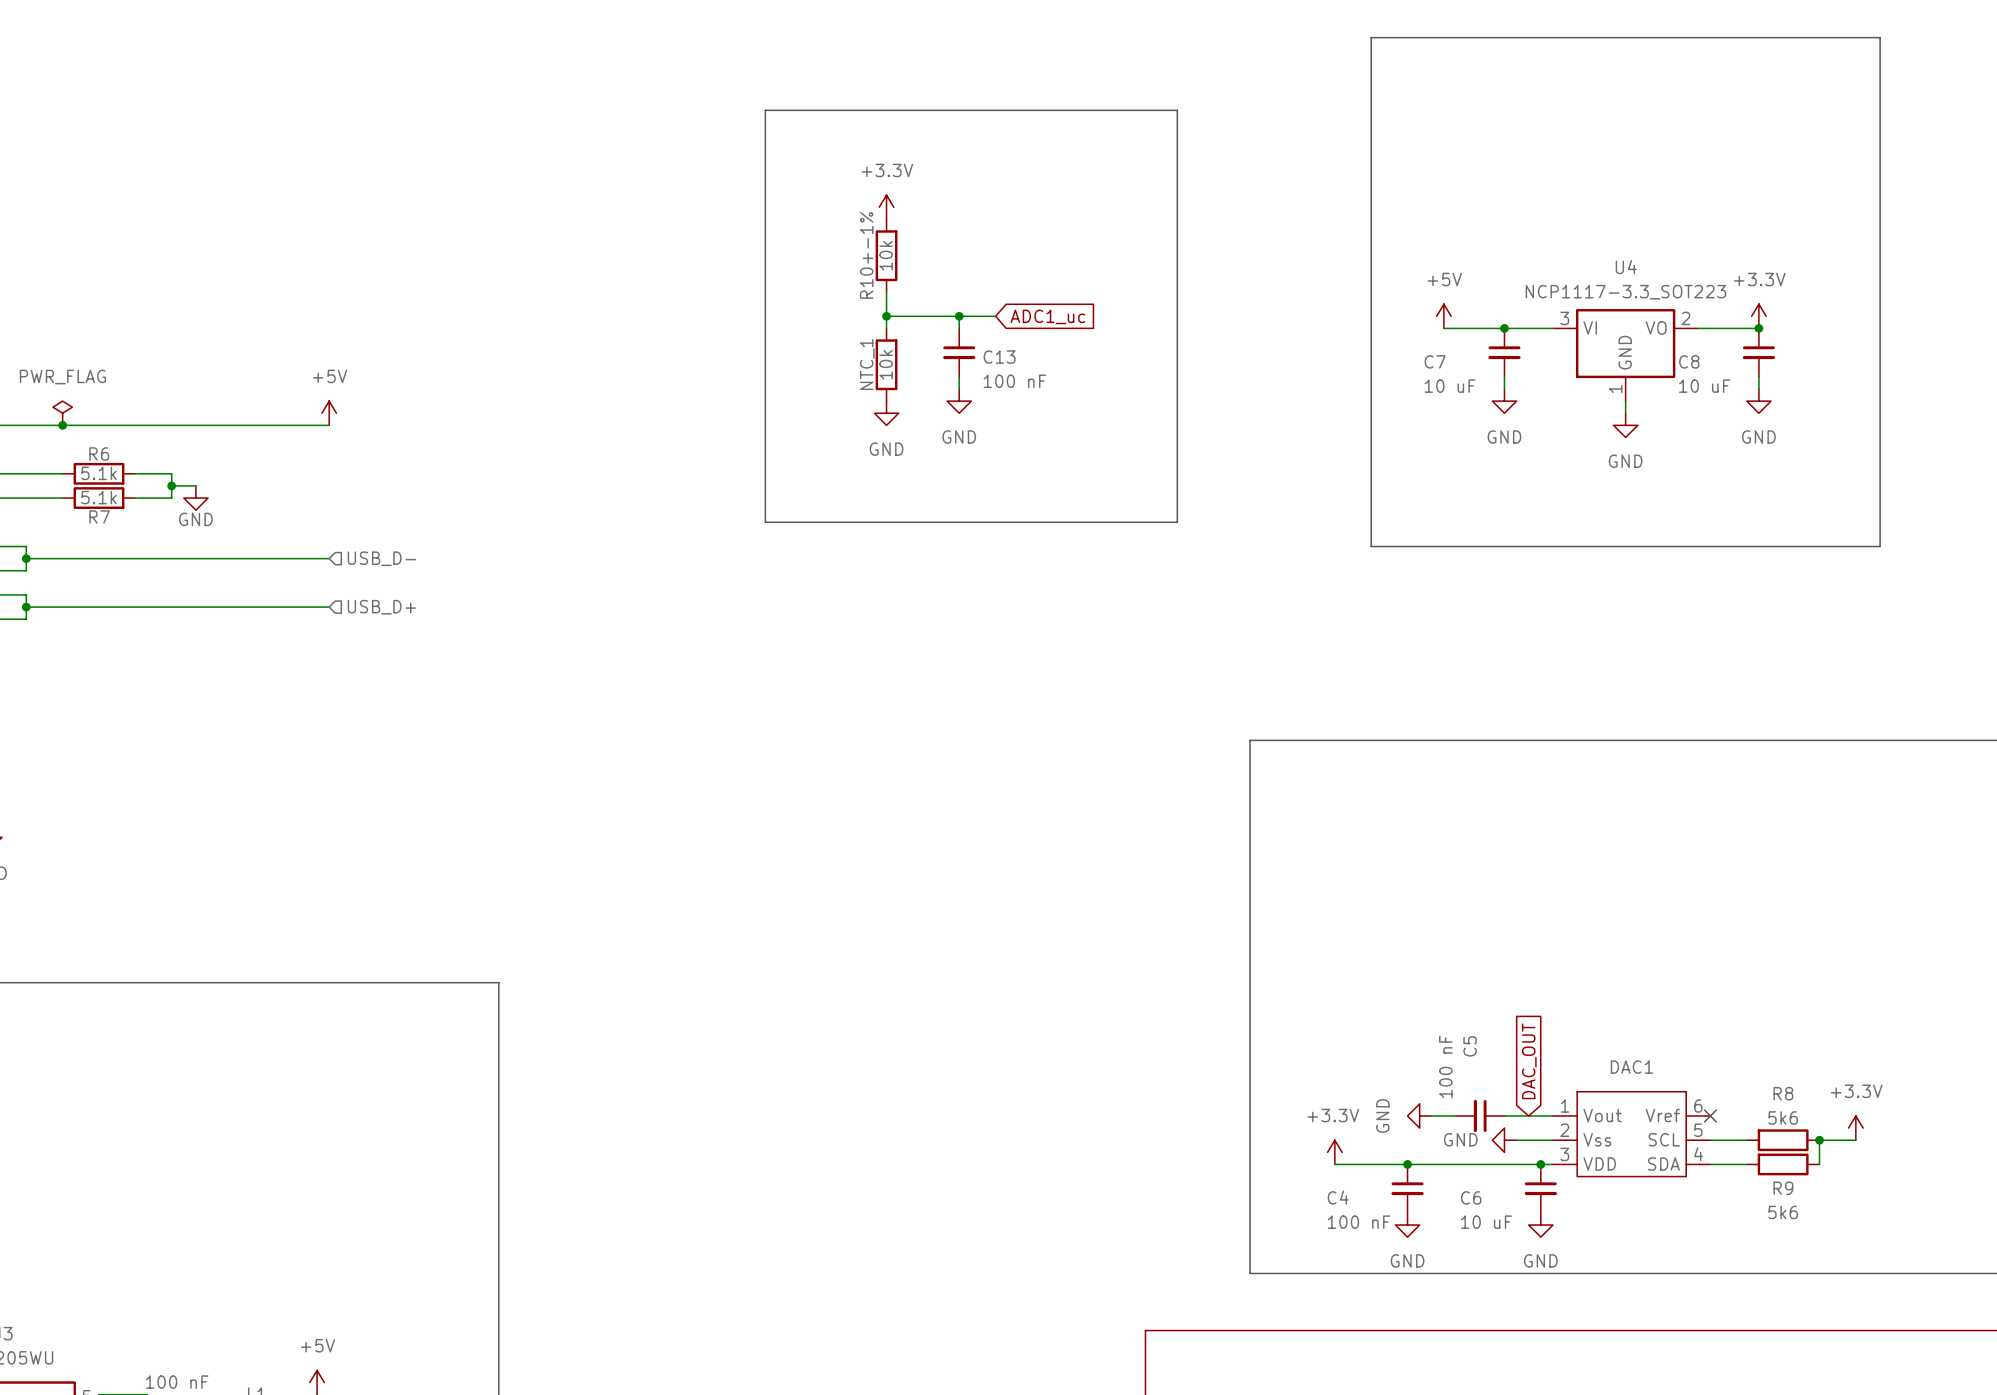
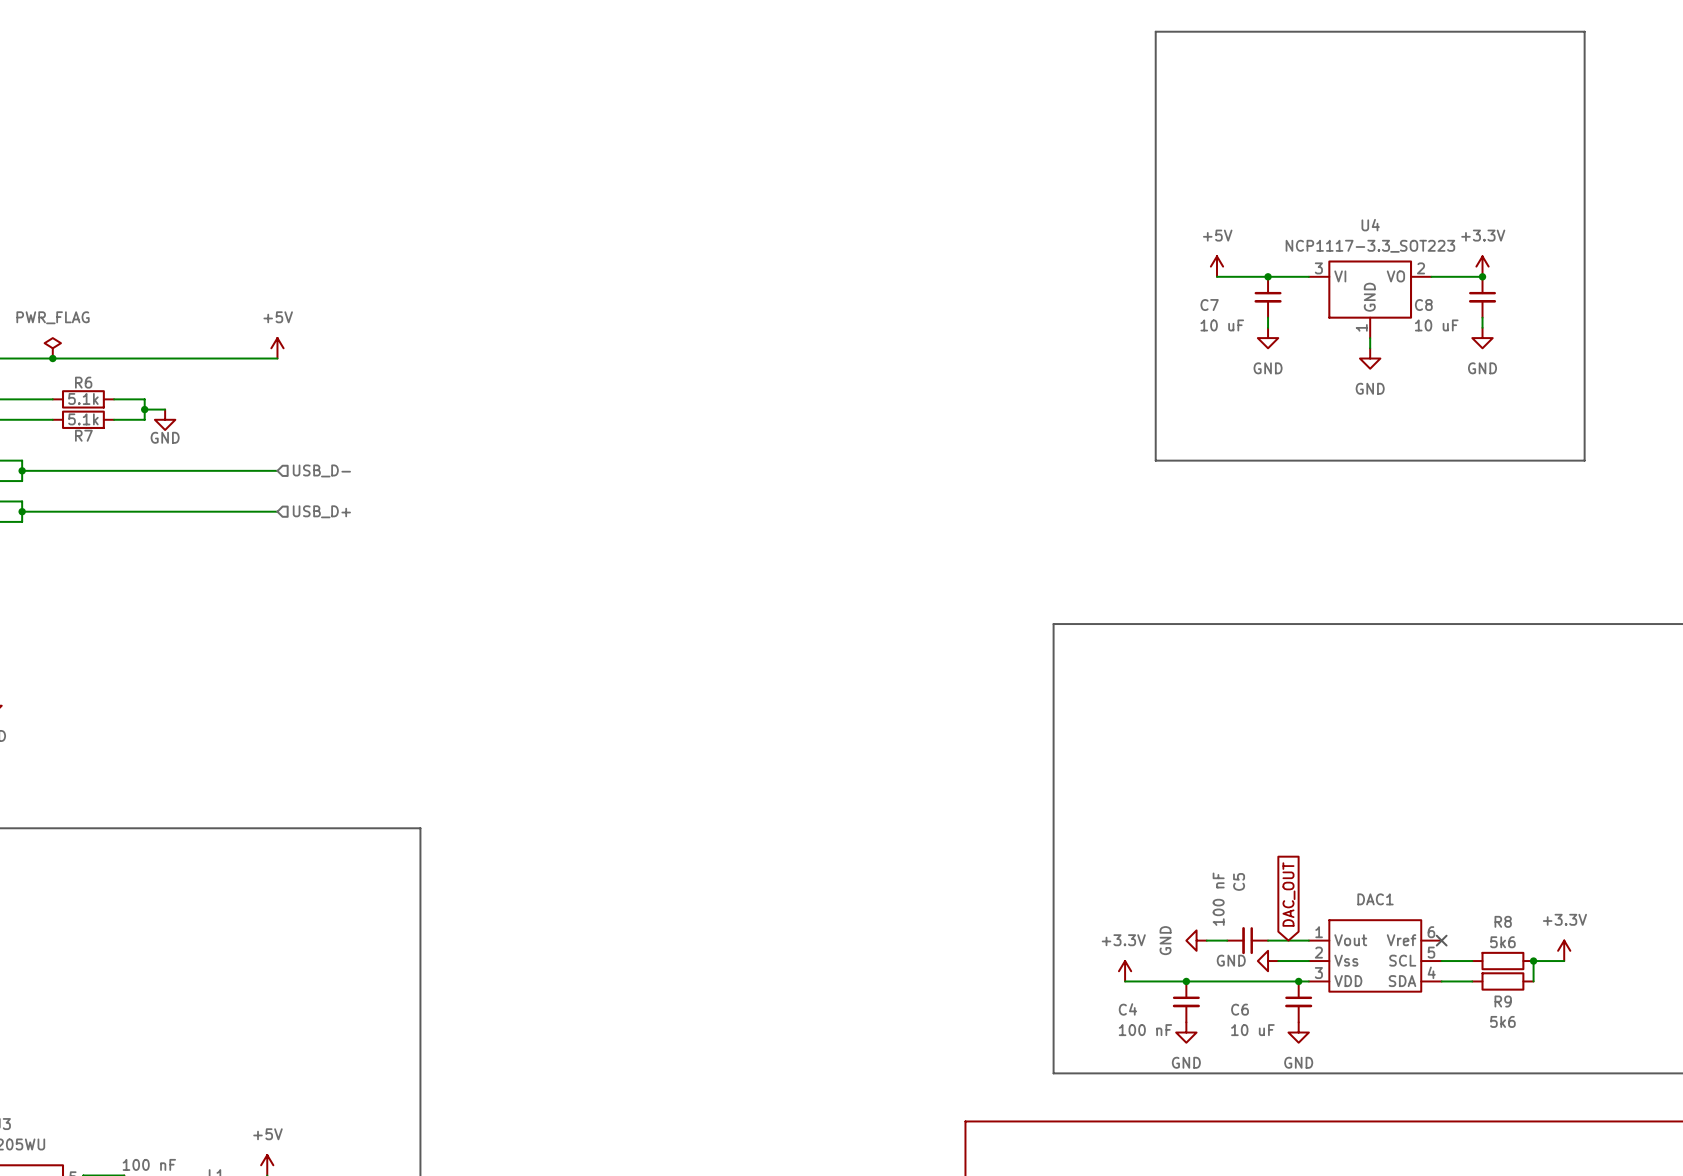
line: (765, 110) (1177, 110) (1177, 522) (765, 522) (765, 110) -> none
power symbol: +3.3V (886, 207) -> none
R10+-1%: 10k (886, 255) -> none
wire: (886, 292) (886, 328) -> none
wire: (886, 316) (995, 316) -> none
junction: (886, 316) -> none
wire: (959, 316) (959, 328) -> none
junction: (959, 316) -> none
global label: ADC1_uc (1047, 316) -> none
C13: 100 nF (959, 352) -> none
NTC_1: 10k (886, 364) -> none
wire: (959, 376) (959, 389) -> none
power symbol: GND (959, 401) -> none
power symbol: GND (886, 413) -> none

